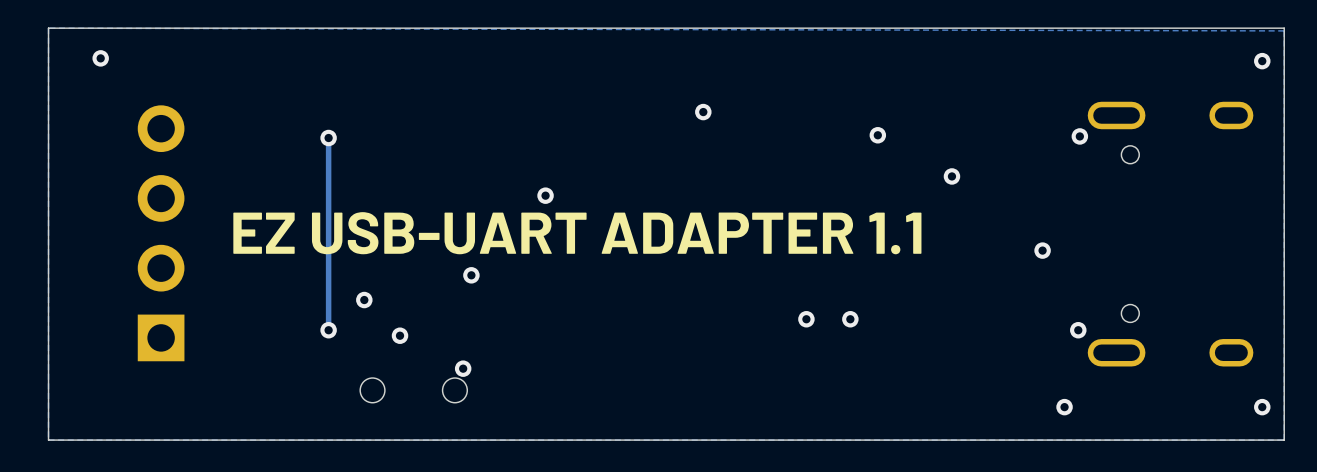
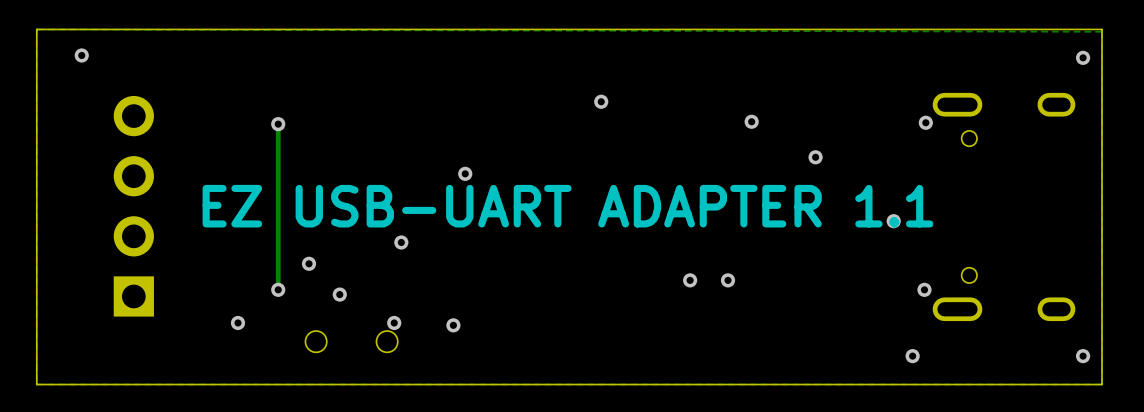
via: none -> (237, 322)
via: none -> (453, 325)

